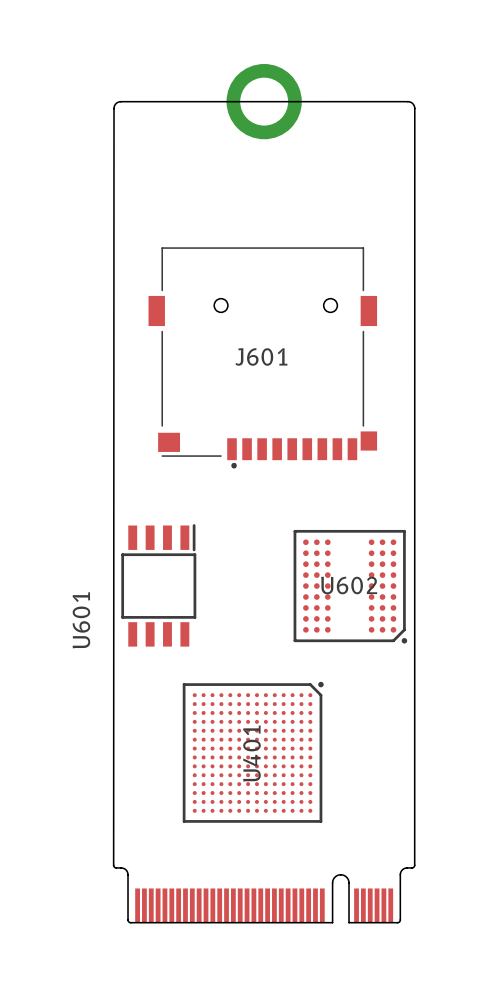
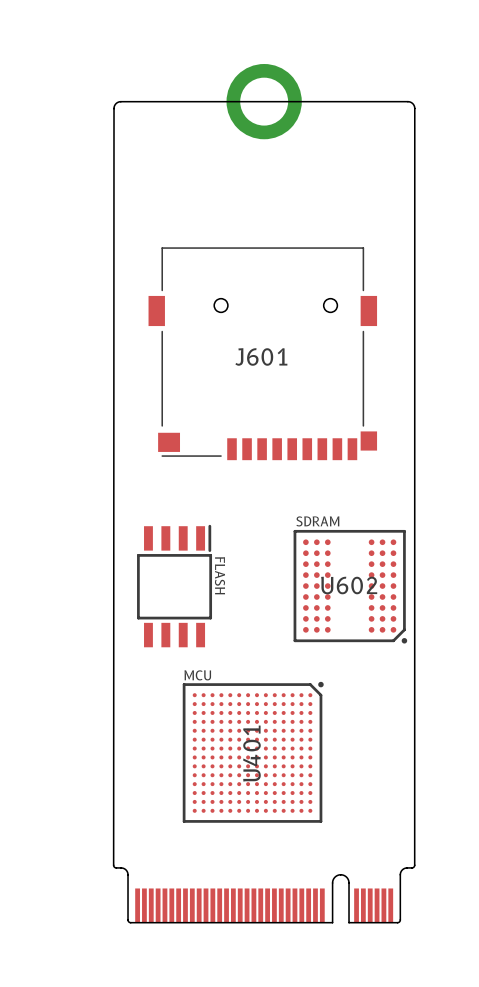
J601 footprint: [148, 247, 378, 469] -> [148, 247, 378, 461]
text: none -> SDRAM (317, 521)
text: none -> FLASH (220, 575)
U601: (158, 585) -> none
part: none -> (174, 586)
text: none -> MCU (197, 675)

